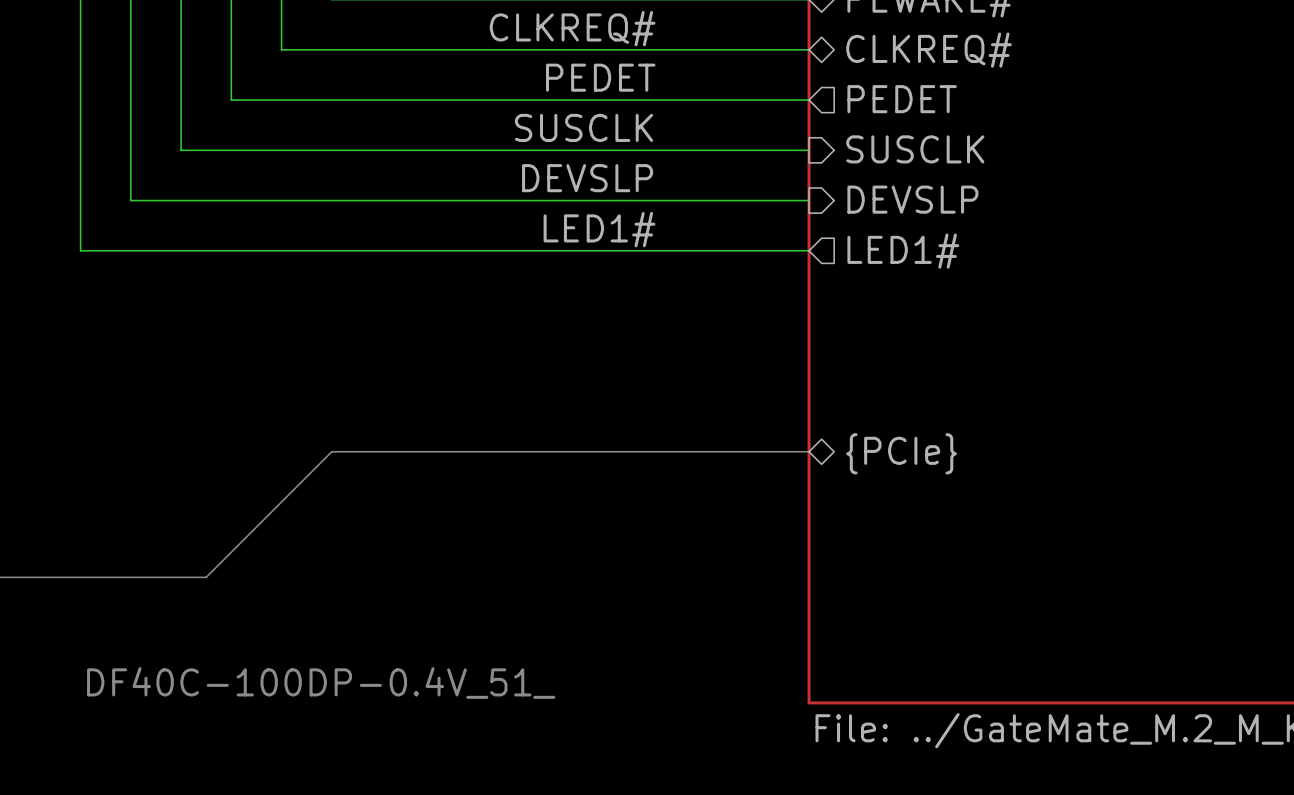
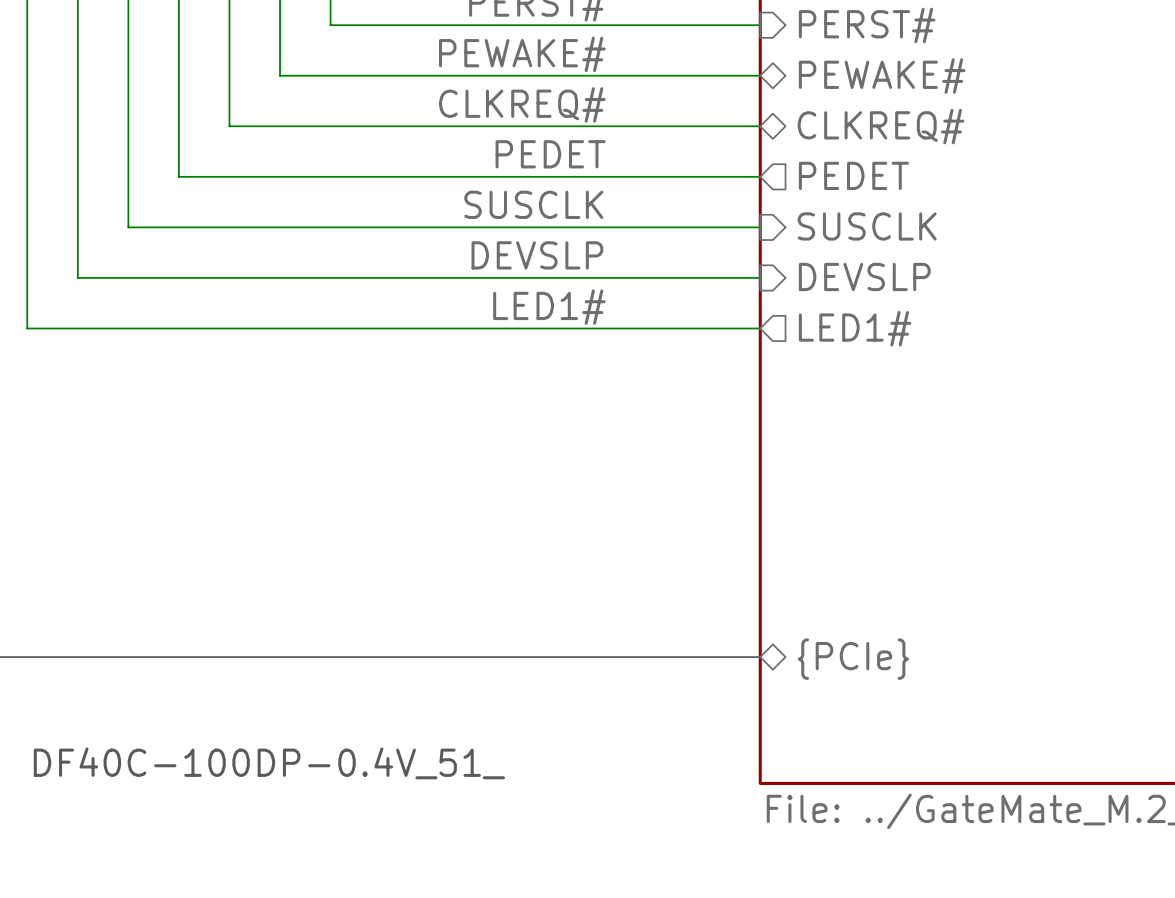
bus: (809, 451) (331, 451) (206, 577) -> (760, 657) (153, 657)
sheet pin position: {PCIe} (901, 453) -> {PCIe} (853, 659)

